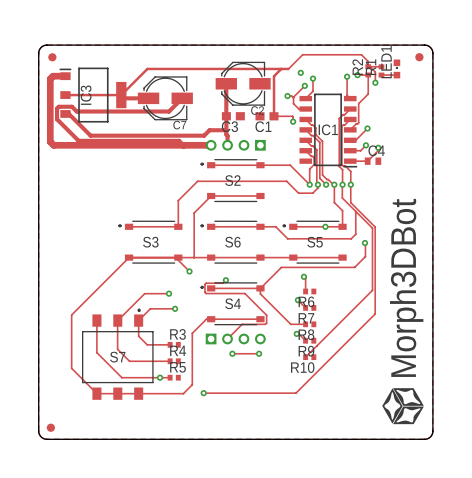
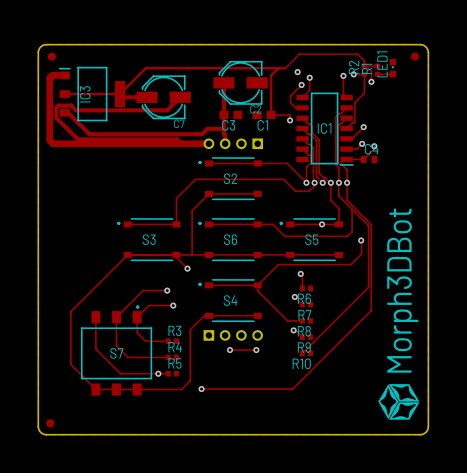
track: (287, 96) (293, 97) -> none
via: (287, 96) -> none
track: (225, 280) (222, 283) (206, 283) (204, 292) (244, 293) (266, 315) (265, 324) (242, 324) (227, 338) -> none
via: (225, 280) -> none

